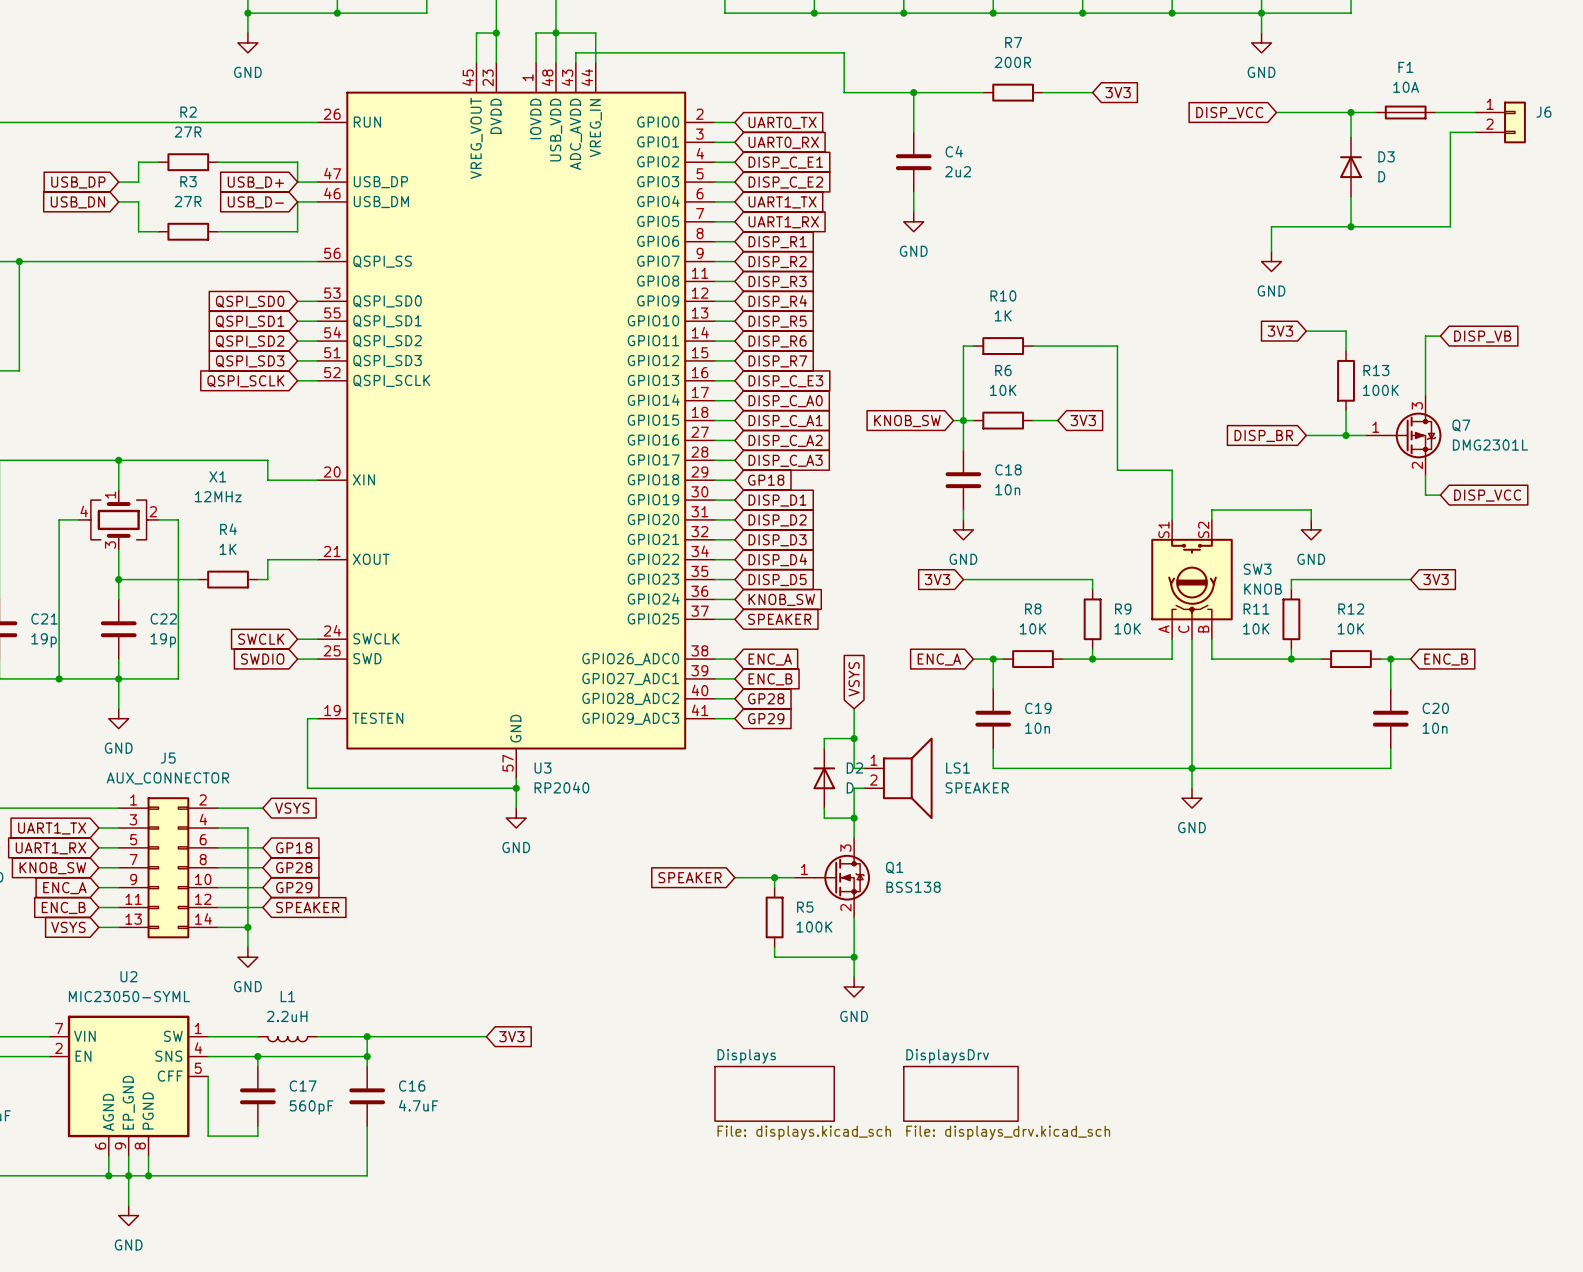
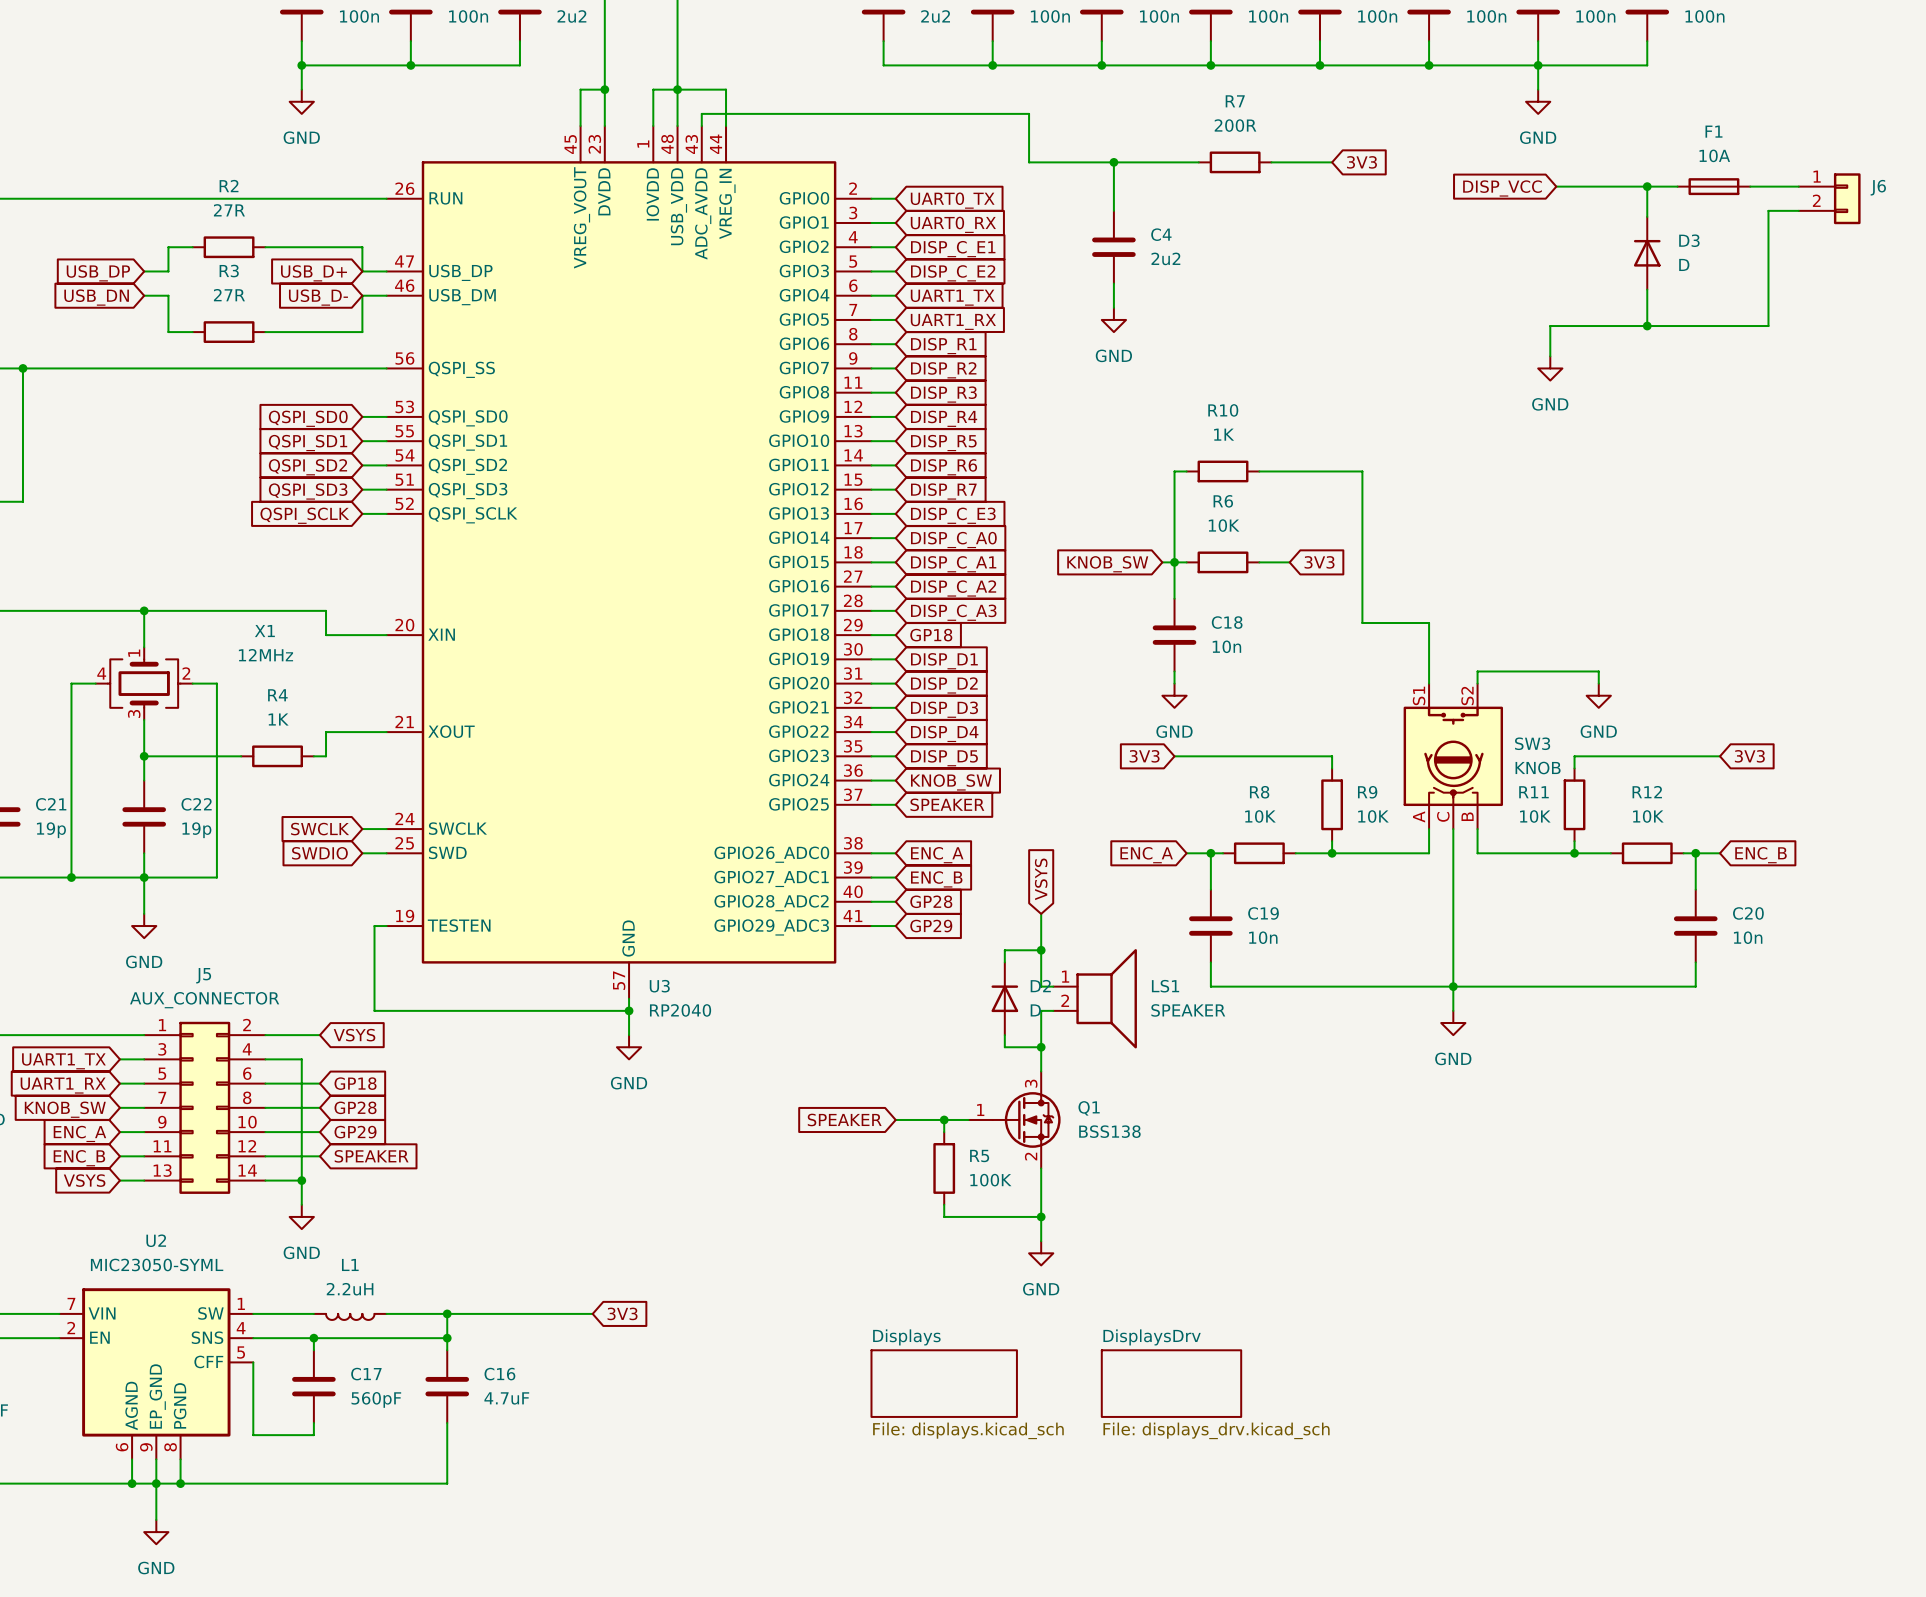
global label: 3V3 (1280, 331) -> none
wire: (1306, 331) (1346, 331) (1346, 351) -> none
wire: (1440, 336) (1425, 336) (1425, 395) -> none
global label: DISP_VB (1482, 336) -> none
R13: 100K (1346, 380) -> none
wire: (1346, 410) (1346, 435) -> none
global label: DISP_BR (1263, 435) -> none
wire: (1306, 435) (1365, 435) -> none
junction: (1346, 435) -> none
Q7: DMG2301L (1403, 435) -> none
wire: (1425, 475) (1425, 495) (1440, 495) -> none
global label: DISP_VCC (1487, 495) -> none

